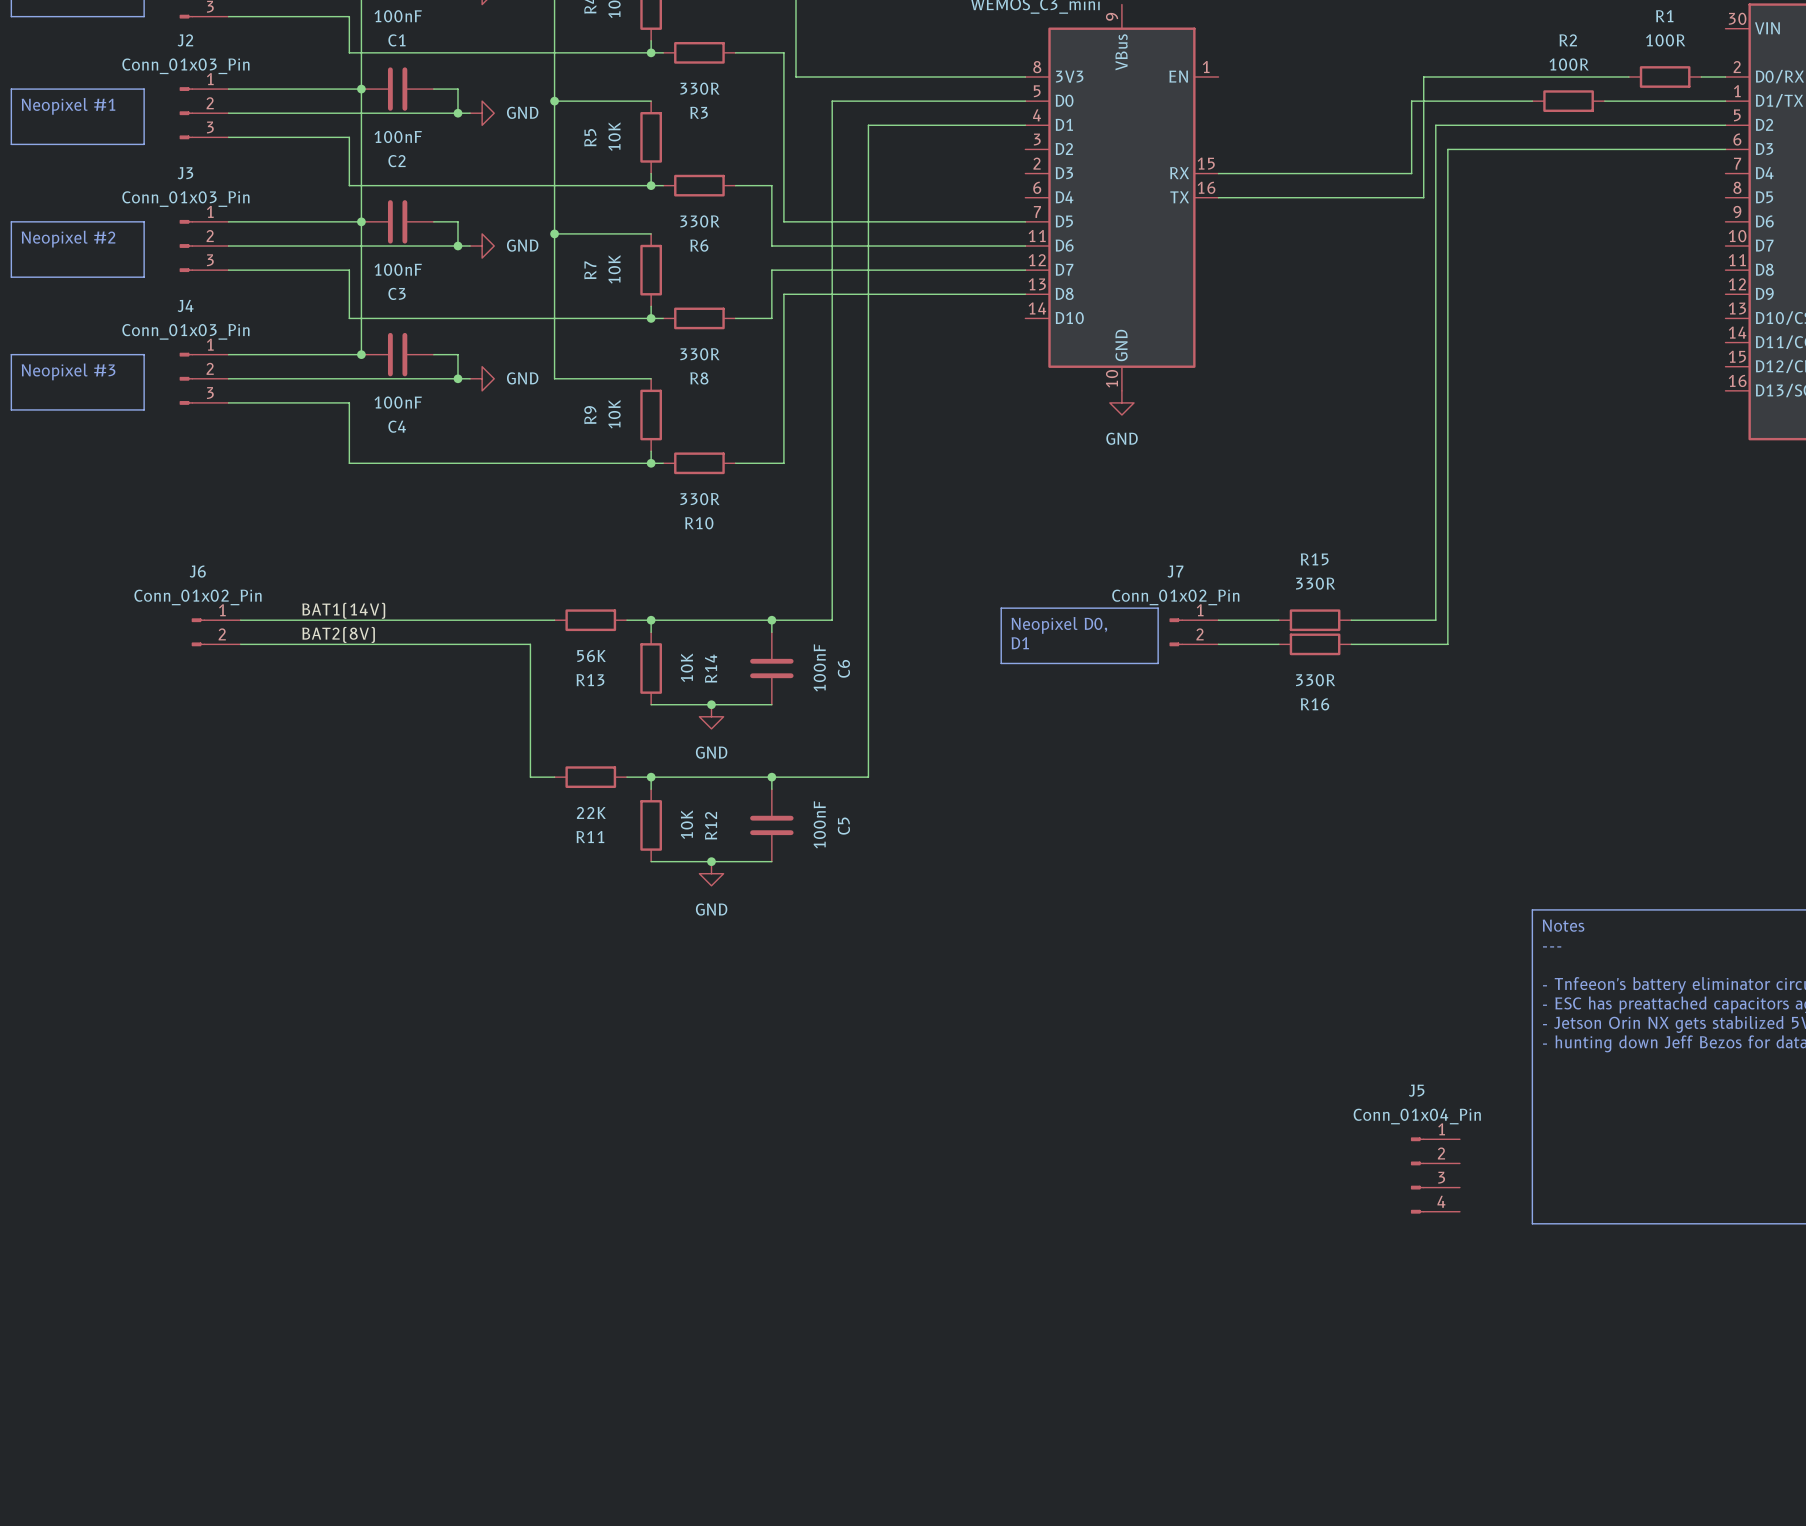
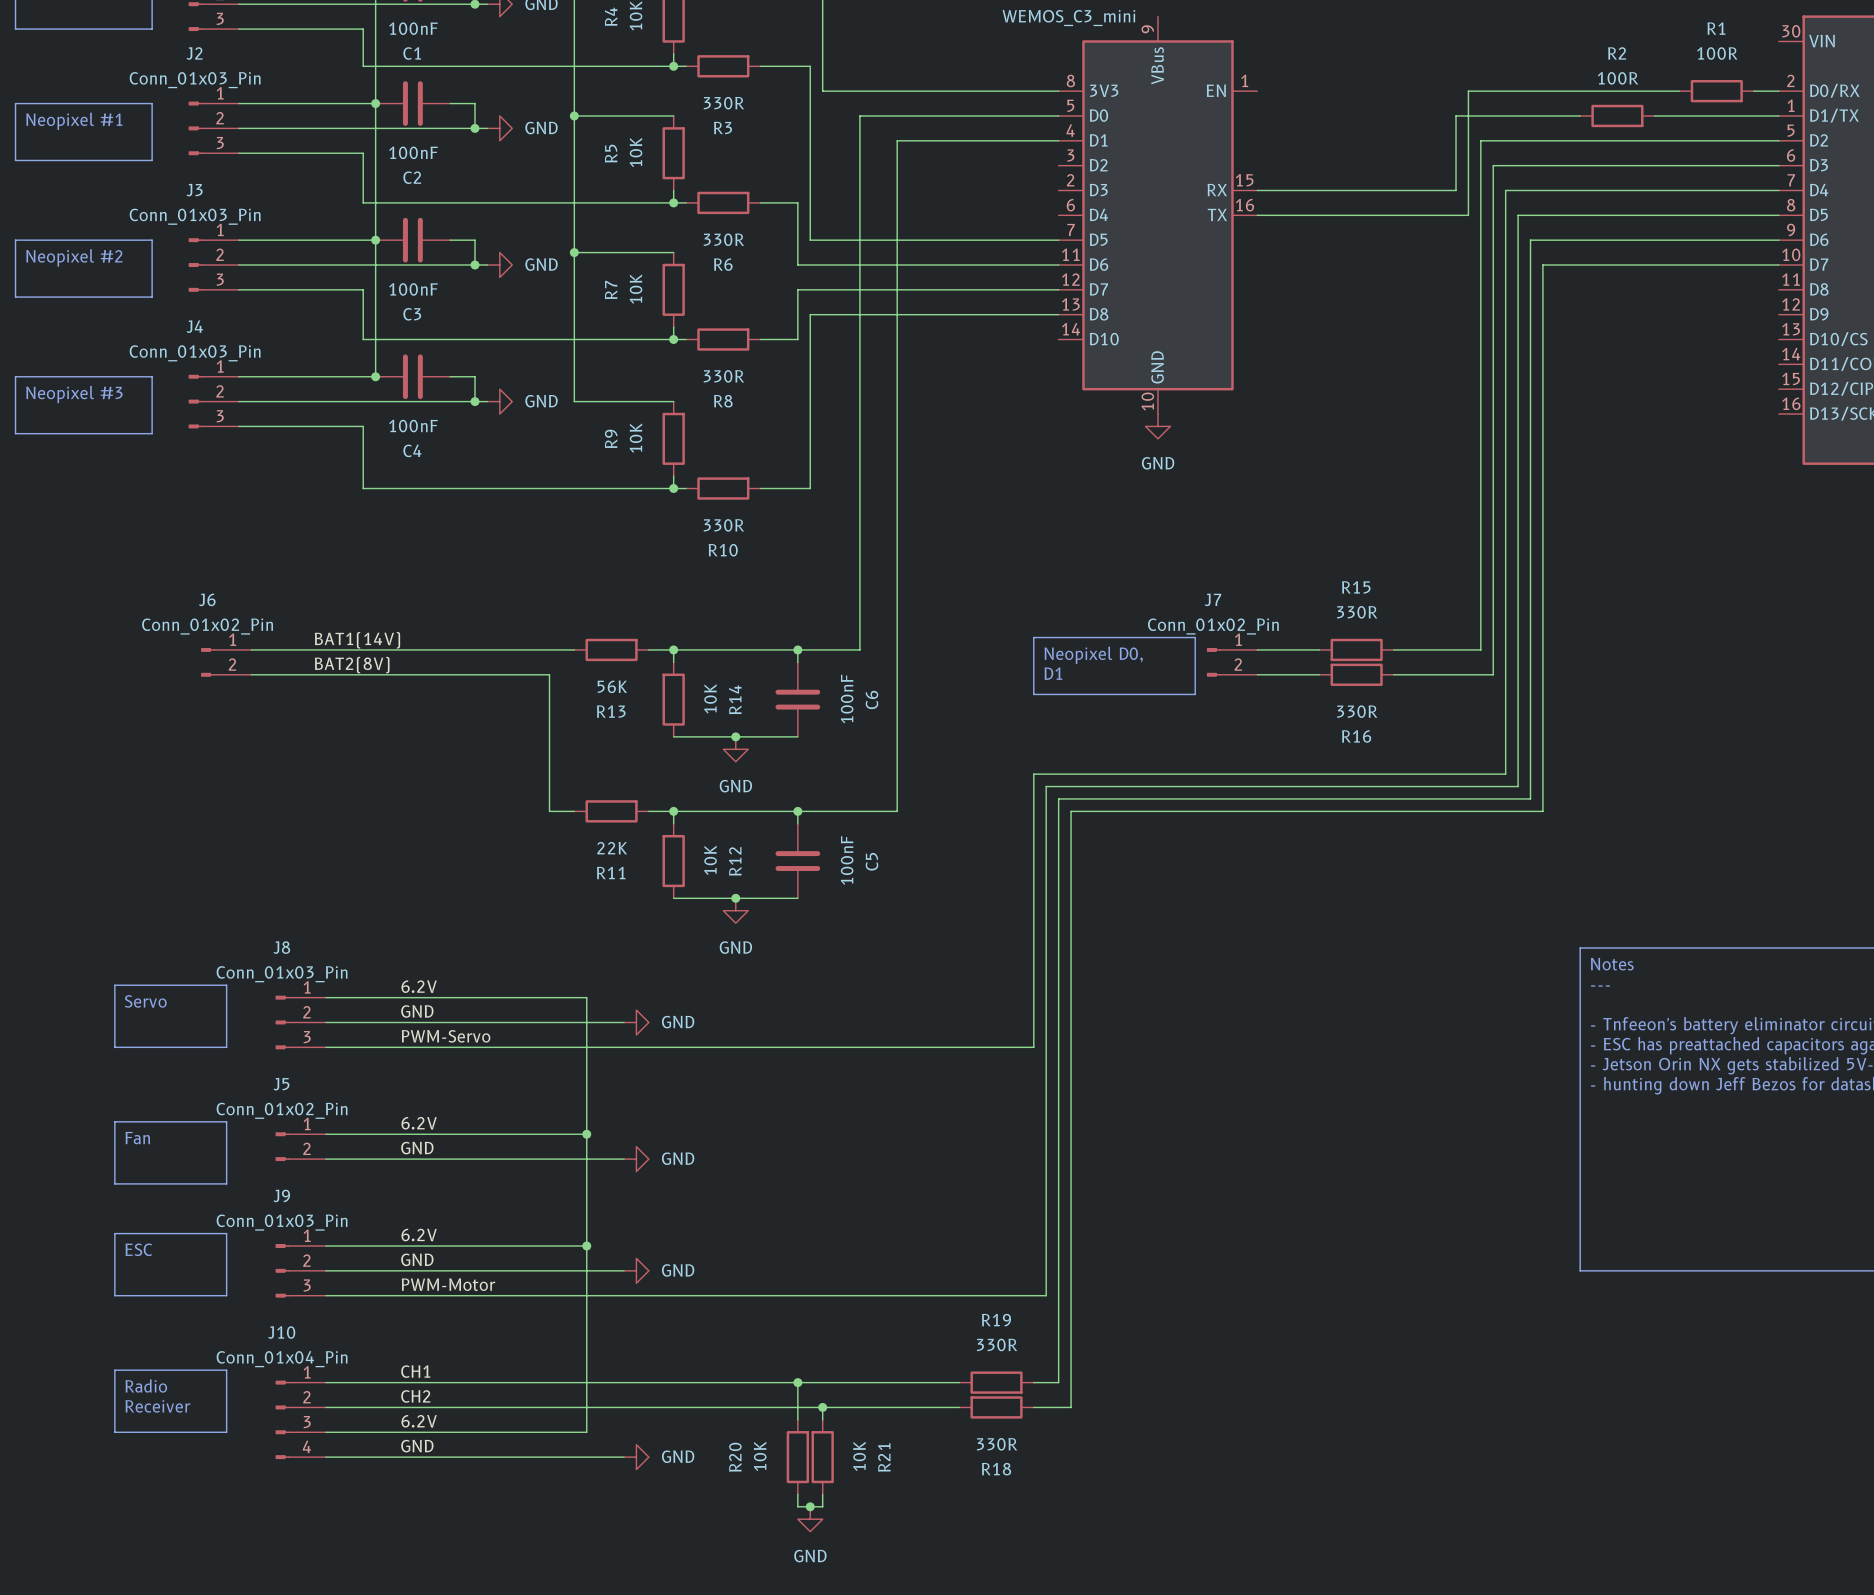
wire: none -> (1778, 190) (1505, 190) (1505, 774) (1033, 774) (1033, 1047) (325, 1047)
wire: none -> (1778, 215) (1518, 215) (1518, 786) (1046, 786) (1046, 1295) (325, 1295)
wire: none -> (1778, 240) (1530, 240) (1530, 798) (1058, 798) (1058, 1382) (1033, 1382)
wire: none -> (1778, 265) (1542, 265) (1542, 811) (1071, 811) (1071, 1407) (1033, 1407)
line: none -> (114, 985) (114, 1047) (226, 1047) (226, 985) (114, 985)
label: none -> 6.2V (419, 986)
wire: none -> (325, 997) (586, 997) (586, 1432) (325, 1432)
text: none -> Servo (145, 1001)
label: none -> GND (417, 1011)
J8: none -> Conn_01x03_Pin (300, 1022)
wire: none -> (325, 1022) (624, 1022)
power symbol: none -> GND (636, 1022)
label: none -> PWM-Servo (446, 1036)
line: none -> (114, 1121) (114, 1183) (226, 1183) (226, 1121) (114, 1121)
label: none -> 6.2V (419, 1123)
J5 name position: J5 (1416, 1090) -> J5 (281, 1084)
wire: none -> (325, 1134) (586, 1134)
junction: none -> (586, 1134)
text: none -> Fan (137, 1138)
label: none -> GND (417, 1148)
wire: none -> (325, 1159) (624, 1159)
power symbol: none -> GND (636, 1159)
J5 value: Conn_01x04_Pin (1417, 1116) -> Conn_01x02_Pin (282, 1110)
J5 symbol: [1410, 1137, 1460, 1214] -> [275, 1132, 326, 1162]
line: none -> (114, 1233) (114, 1295) (226, 1295) (226, 1233) (114, 1233)
label: none -> 6.2V (419, 1235)
wire: none -> (325, 1246) (586, 1246)
junction: none -> (586, 1246)
text: none -> ESC (138, 1249)
label: none -> GND (417, 1259)
J9: none -> Conn_01x03_Pin (300, 1270)
wire: none -> (325, 1270) (624, 1270)
power symbol: none -> GND (636, 1270)
label: none -> PWM-Motor (448, 1284)
line: none -> (114, 1370) (226, 1370) (226, 1432) (114, 1432) (114, 1370)
label: none -> CH1 (415, 1371)
wire: none -> (325, 1382) (959, 1382)
wire: none -> (797, 1382) (797, 1419)
junction: none -> (797, 1382)
R19: none -> 330R (996, 1382)
text: none -> Radio (146, 1385)
label: none -> CH2 (415, 1396)
text: none -> Receiver (157, 1406)
wire: none -> (325, 1407) (959, 1407)
wire: none -> (822, 1407) (822, 1419)
junction: none -> (822, 1407)
R18: none -> 330R (996, 1407)
J10: none -> Conn_01x04_Pin (300, 1419)
label: none -> 6.2V (419, 1421)
label: none -> GND (417, 1446)
wire: none -> (325, 1457) (624, 1457)
power symbol: none -> GND (636, 1457)
R20: none -> 10K (797, 1457)
R21: none -> 10K (822, 1457)
wire: none -> (797, 1494) (797, 1506) (822, 1506) (822, 1494)
junction: none -> (810, 1506)
power symbol: none -> GND (810, 1519)

